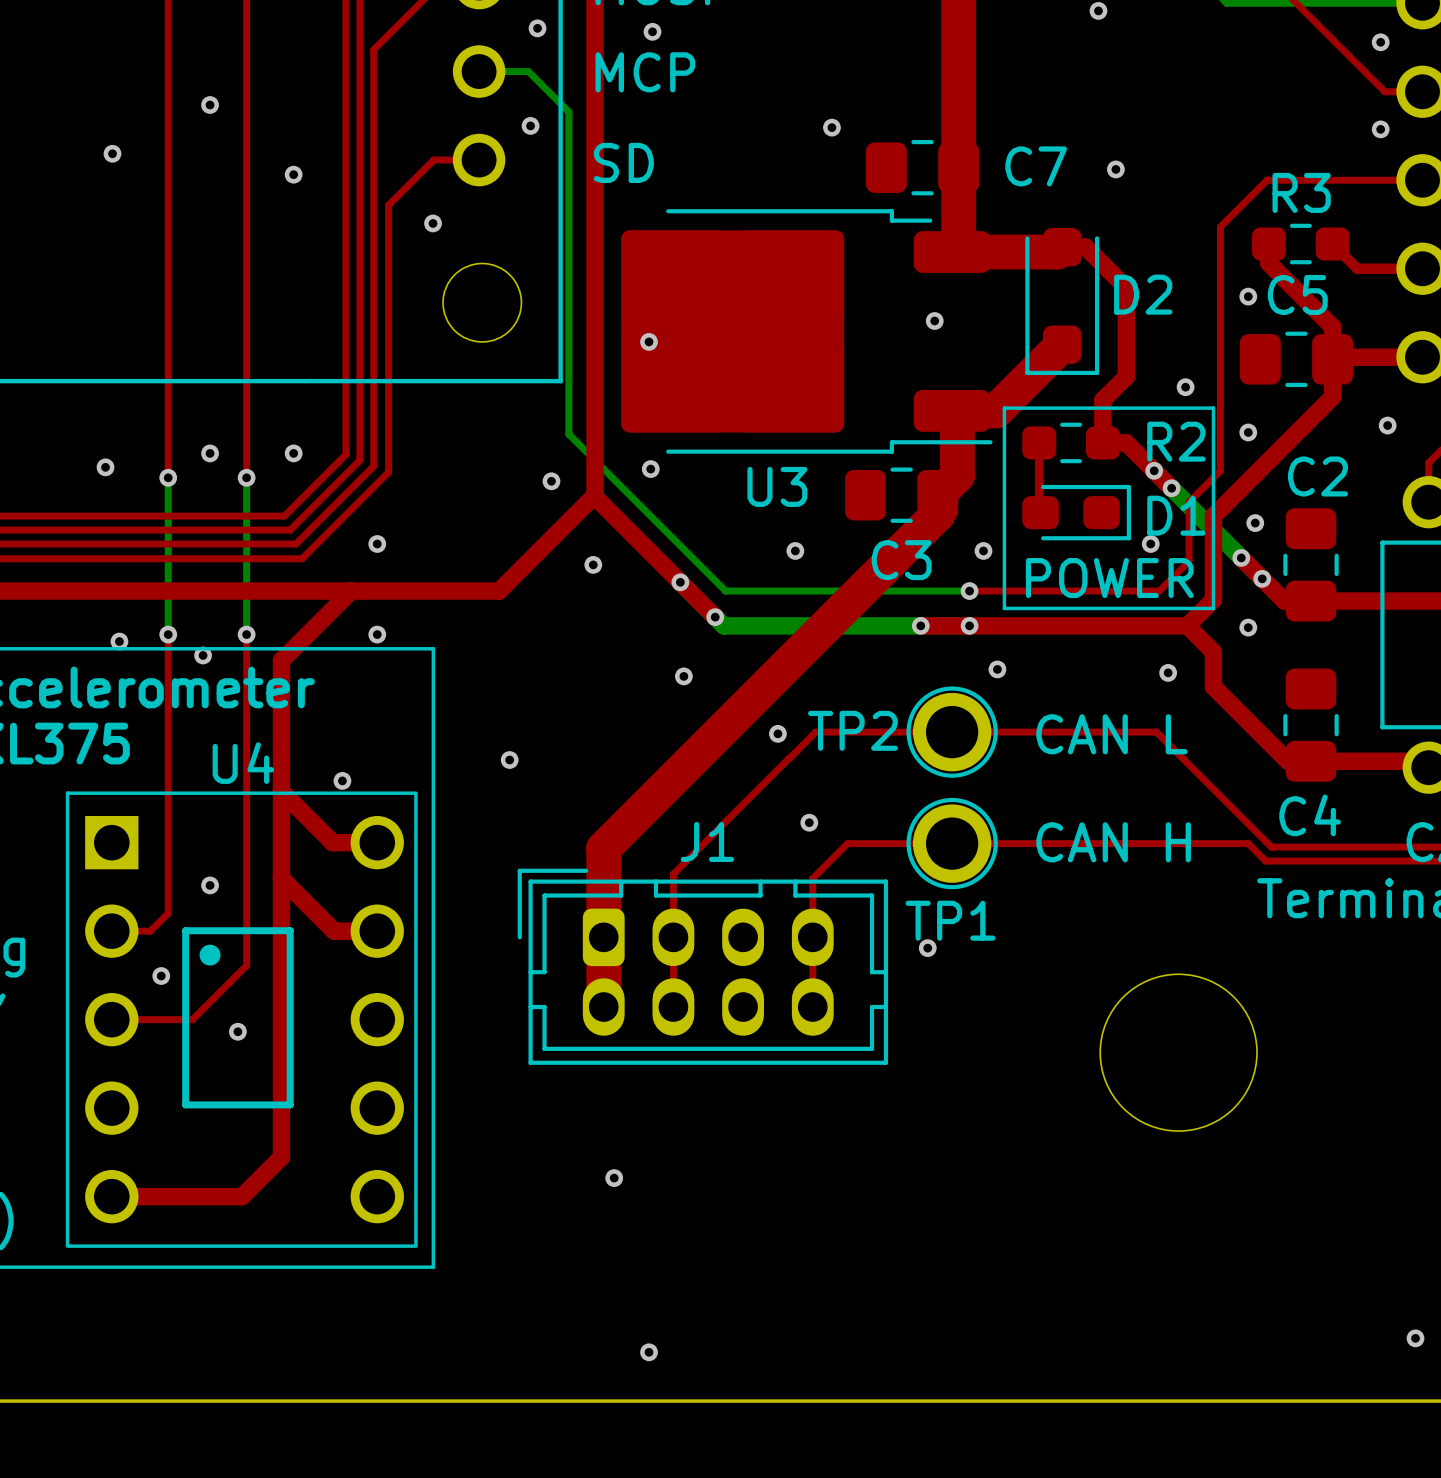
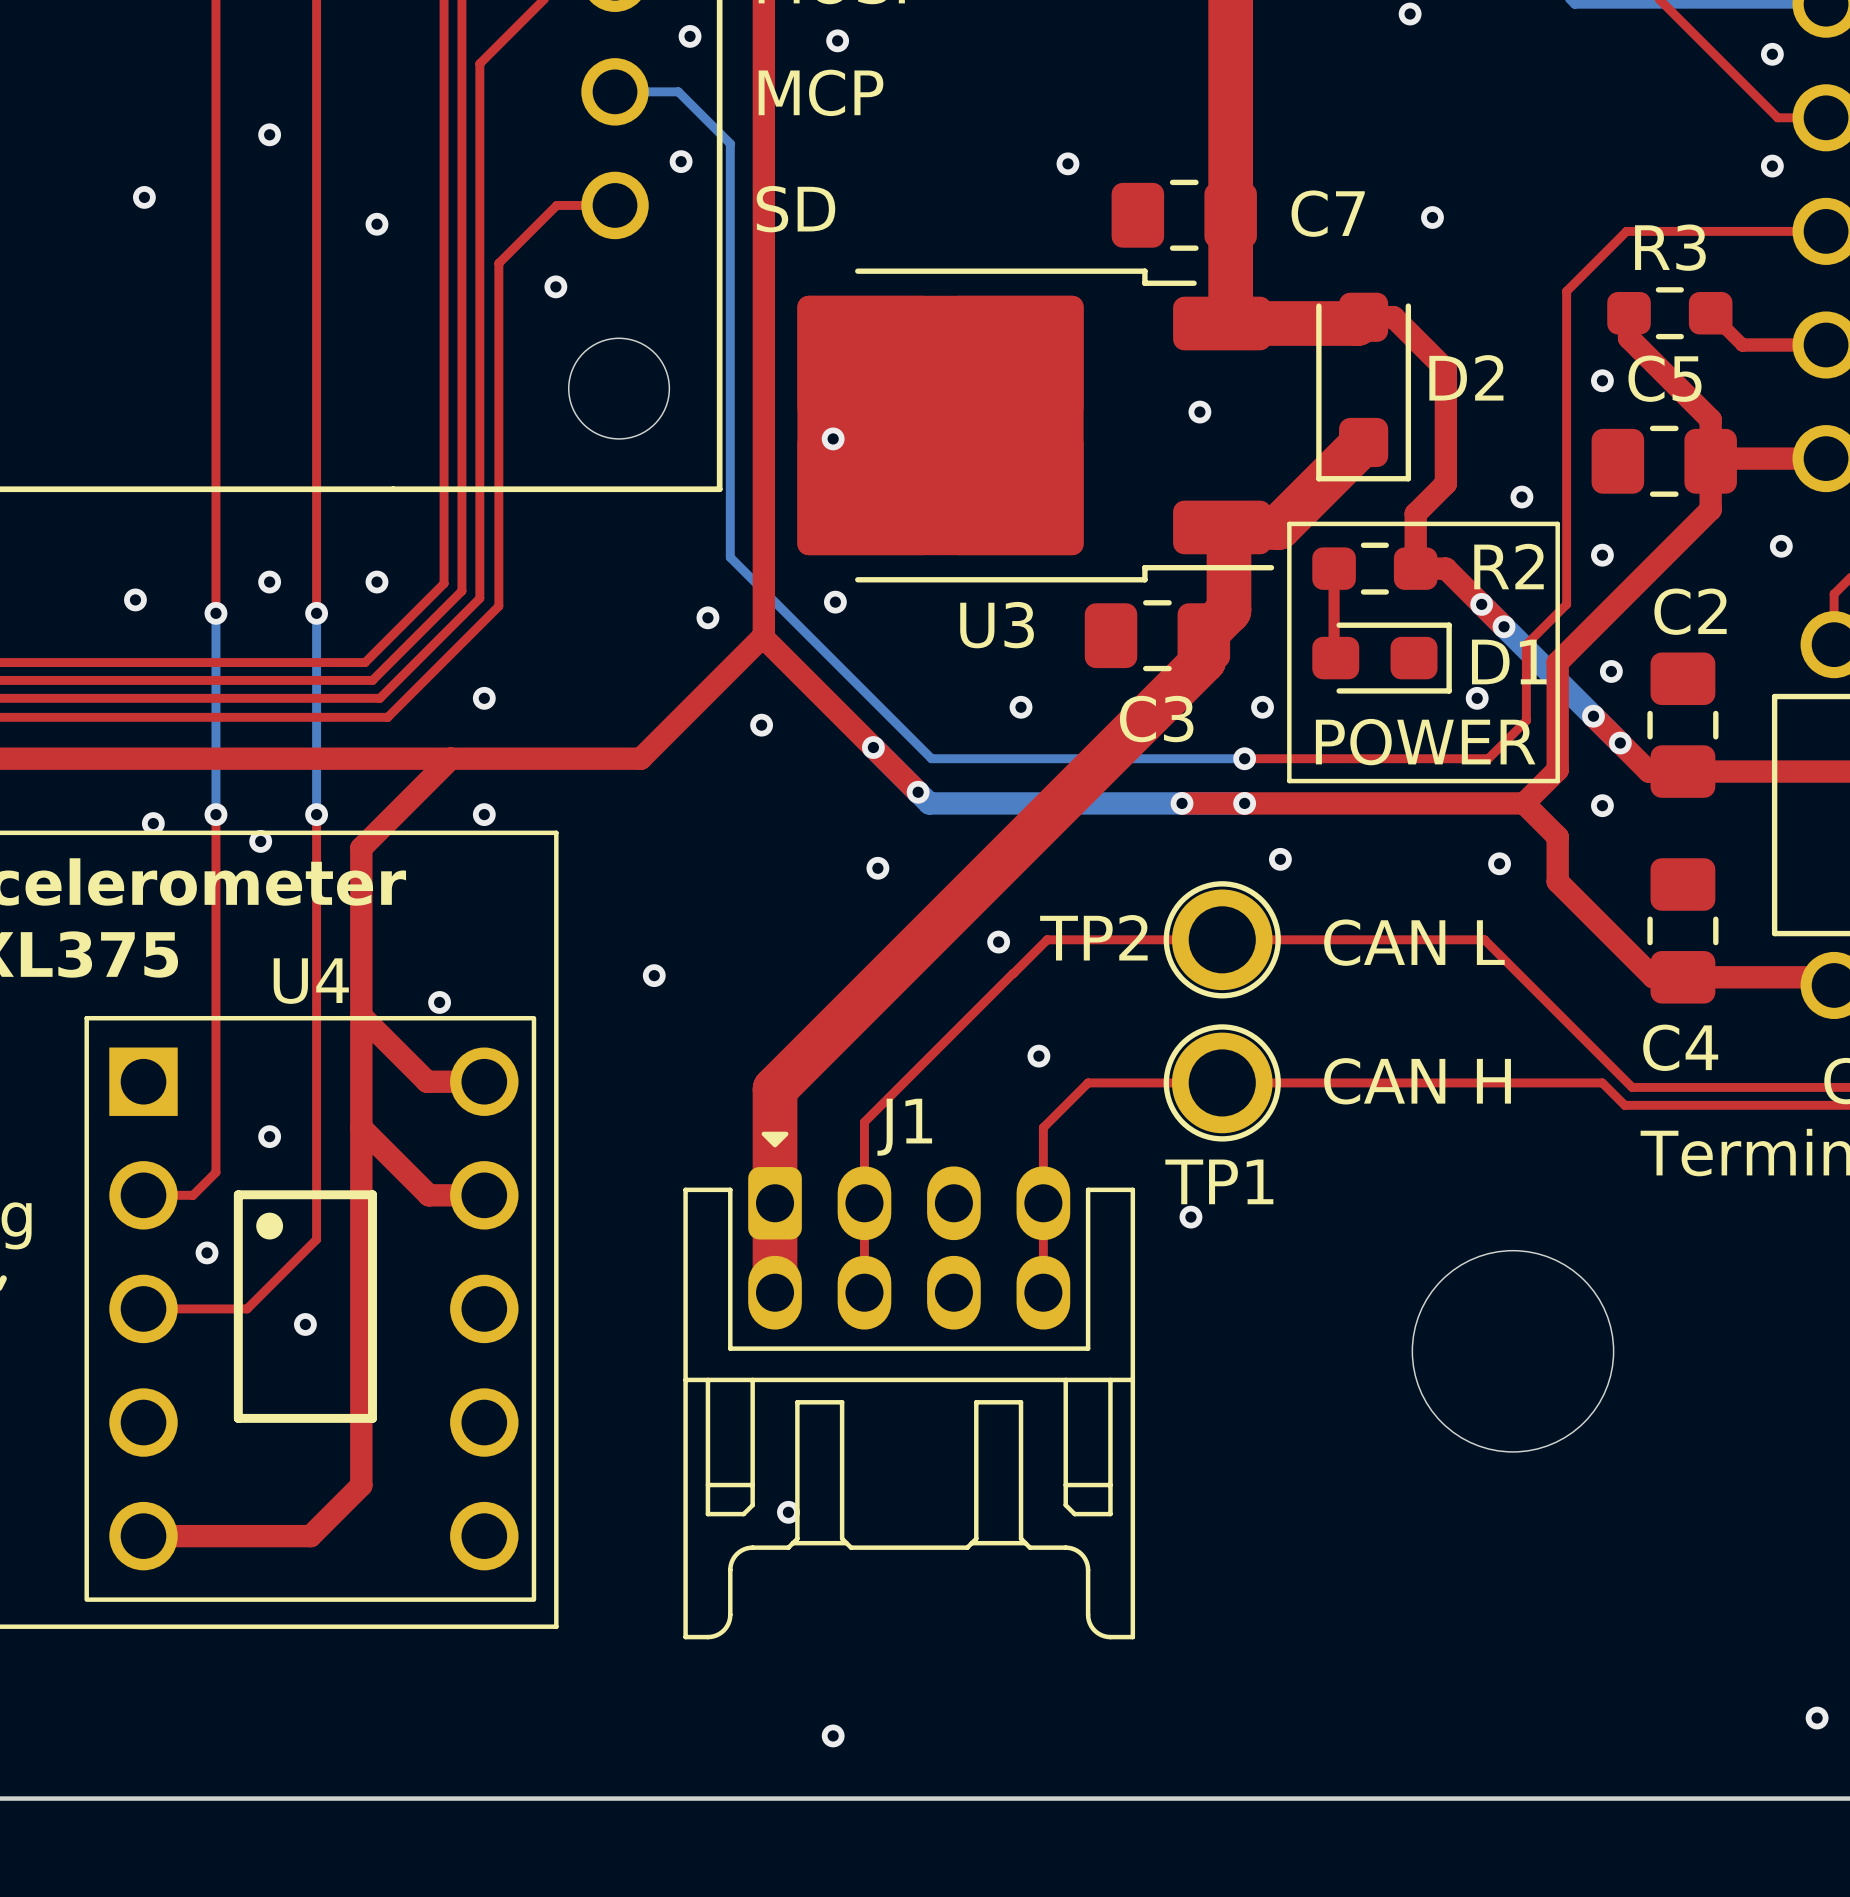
J1 name position: J1 (707, 841) -> J1 (904, 1127)
J1 footprint: [517, 868, 889, 1065] -> [683, 1131, 1136, 1640]

